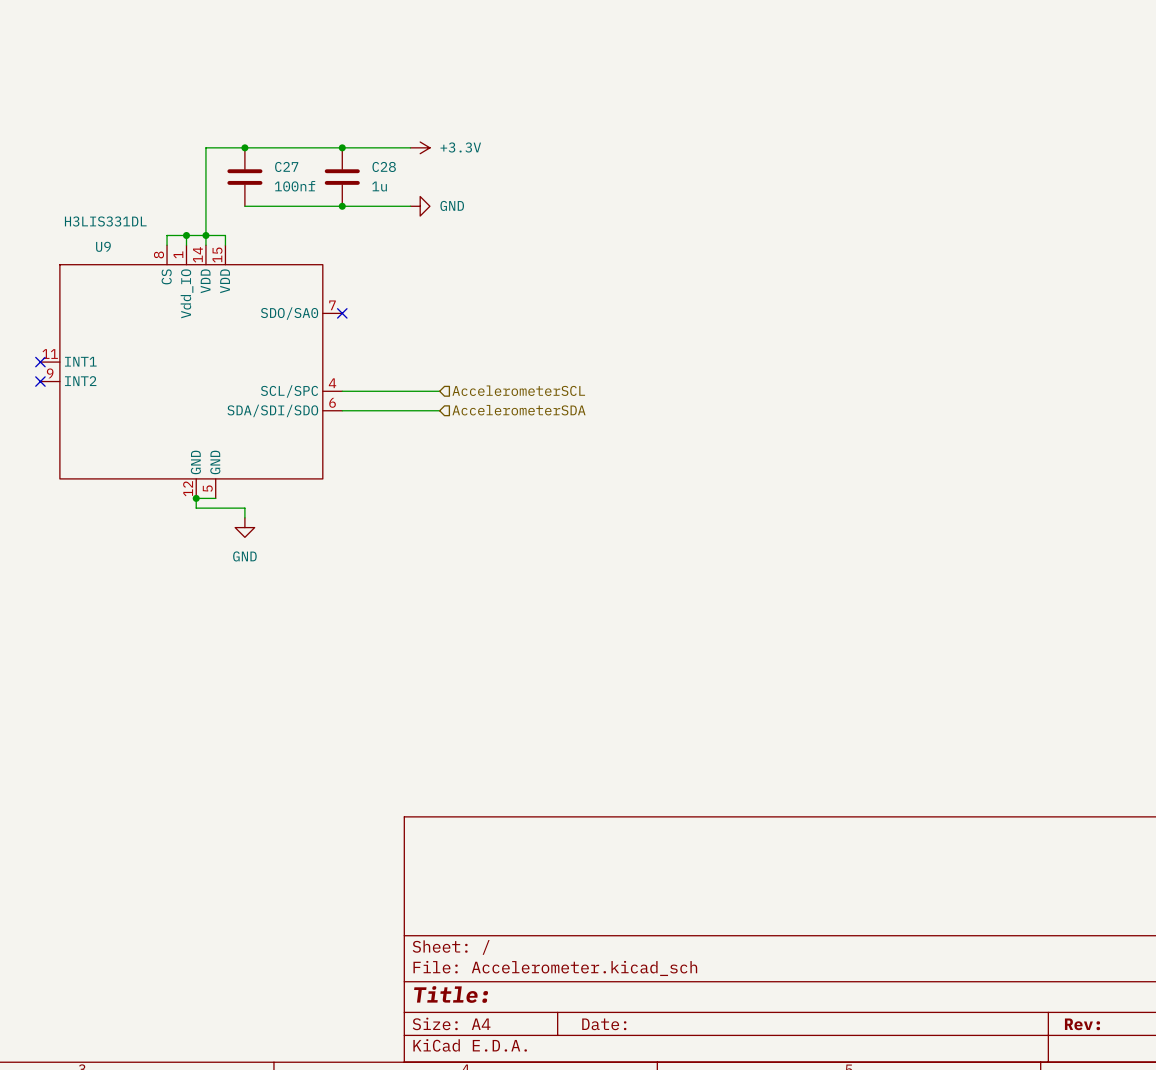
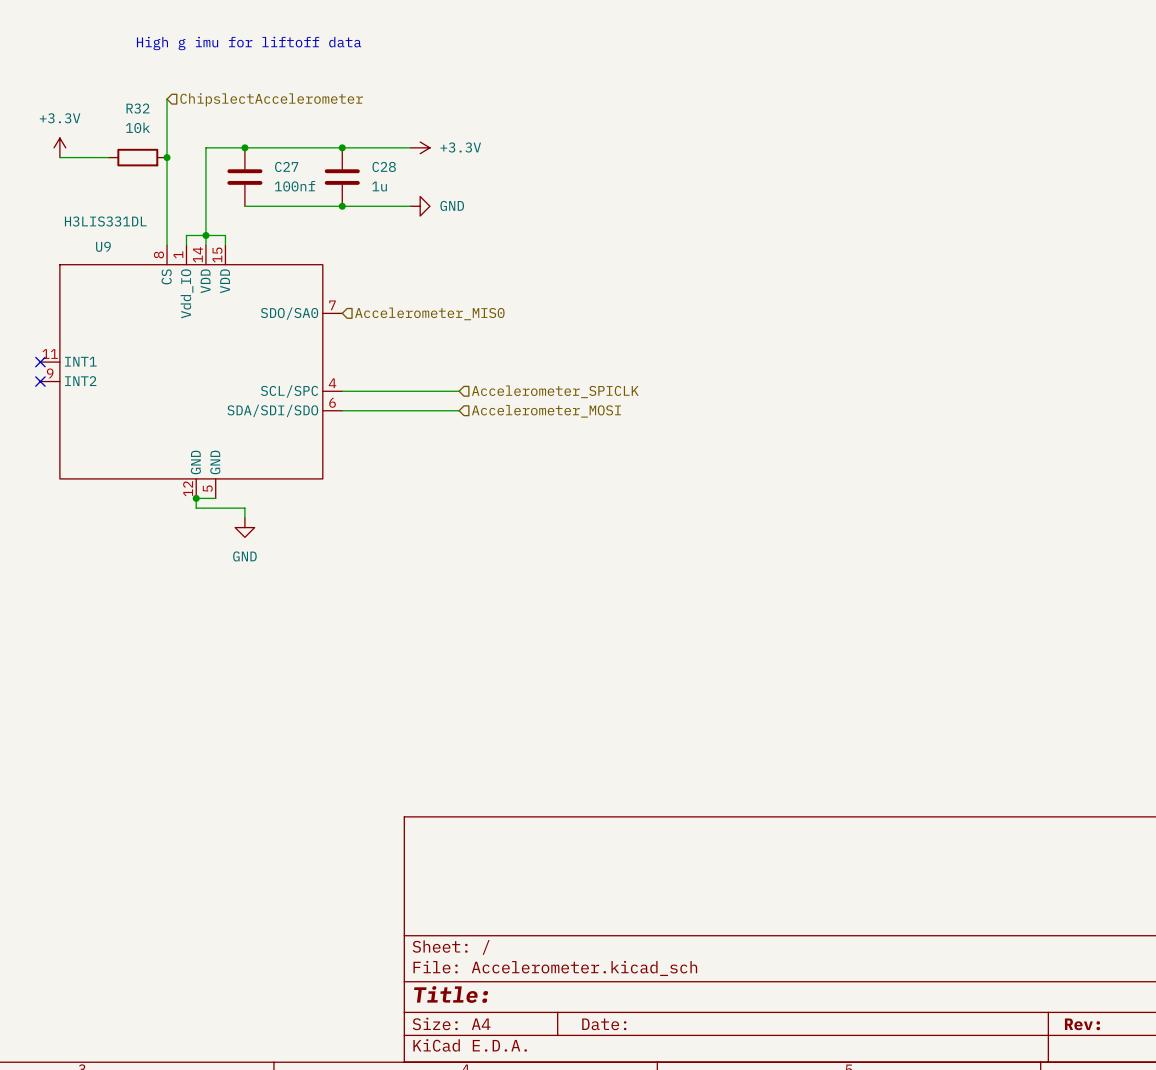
text: none -> High g imu for liftoff data (249, 43)
hierarchical label: none -> ChipslectAccelerometer (271, 99)
power symbol: none -> +3.3V (59, 147)
wire: none -> (59, 157) (108, 157)
R32: none -> 10k (137, 157)
junction: none -> (167, 157)
wire: (167, 235) (186, 235) -> (167, 235) (167, 99)
junction: (186, 235) -> none
no-connect mark: (342, 313) -> none
hierarchical label: none -> Accelerometer_MIS0 (429, 313)
hierarchical label: AccelerometerSCL (518, 390) -> none
wire: none -> (439, 391) (459, 391)
hierarchical label: none -> Accelerometer_SPICLK (555, 391)
wire: none -> (439, 410) (459, 410)
hierarchical label: AccelerometerSDA (518, 410) -> none
hierarchical label: none -> Accelerometer_MOSI (546, 411)

